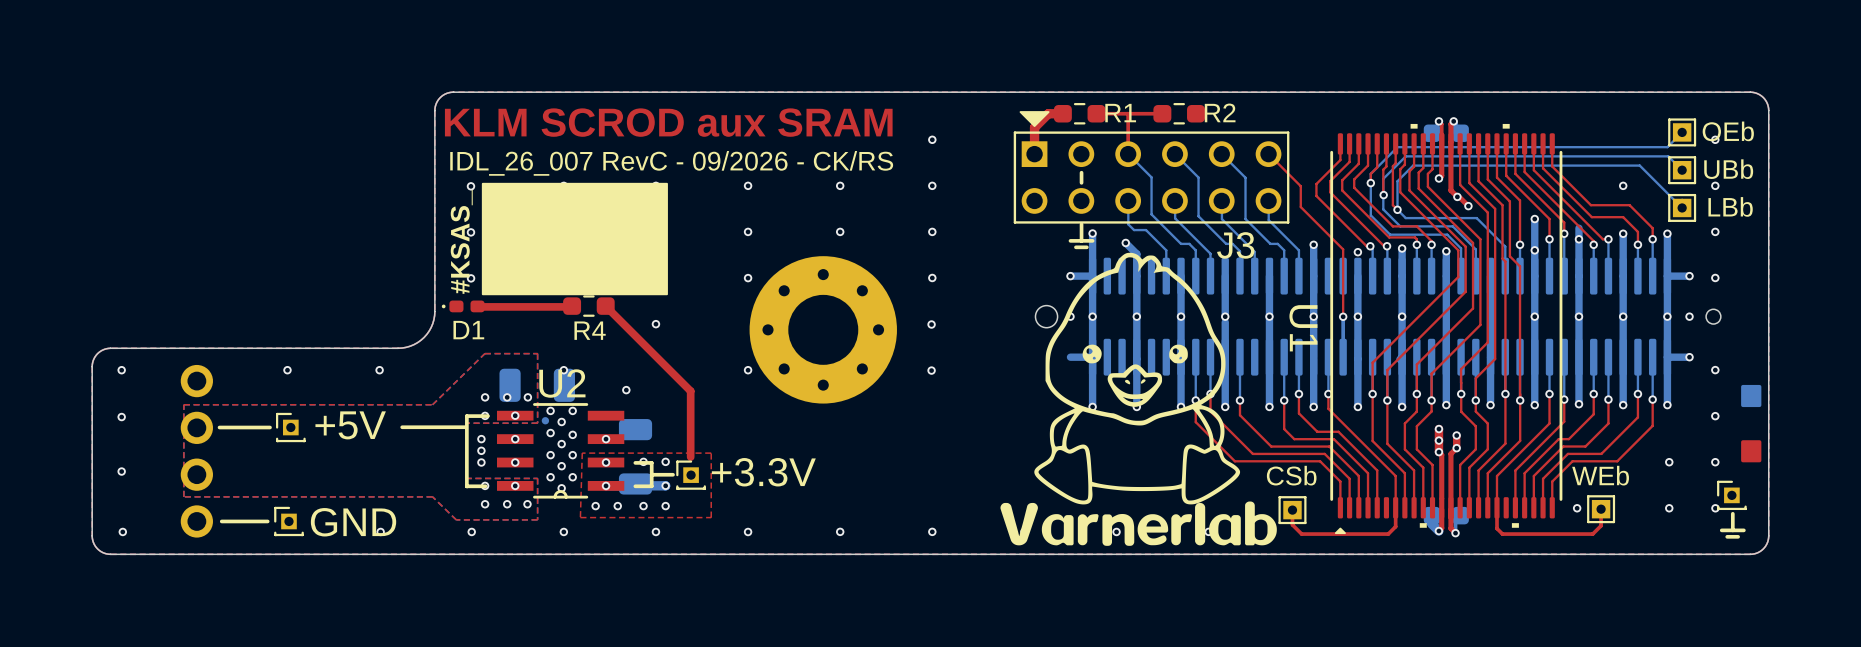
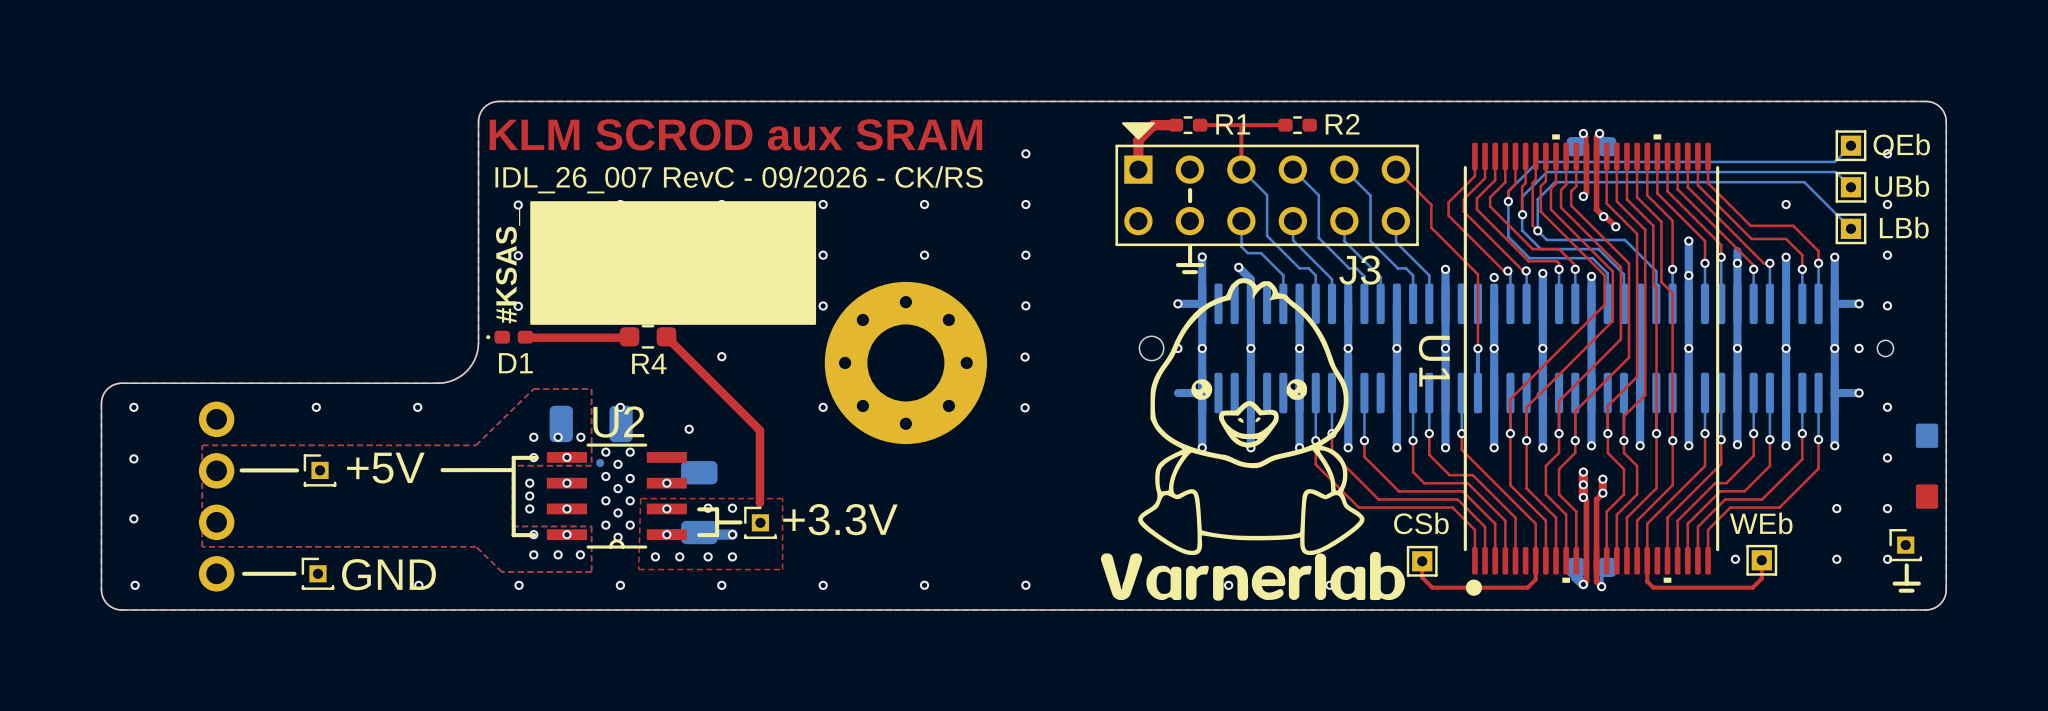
R1 footprint: [1053, 103, 1106, 125] -> [1168, 116, 1208, 135]
R2 footprint: [1153, 103, 1205, 125] -> [1278, 116, 1317, 135]
U1 footprint: [1330, 123, 1563, 535] -> [1463, 134, 1720, 596]
drawing: [481, 182, 668, 296] -> none
drawing: none -> [530, 201, 817, 325]

